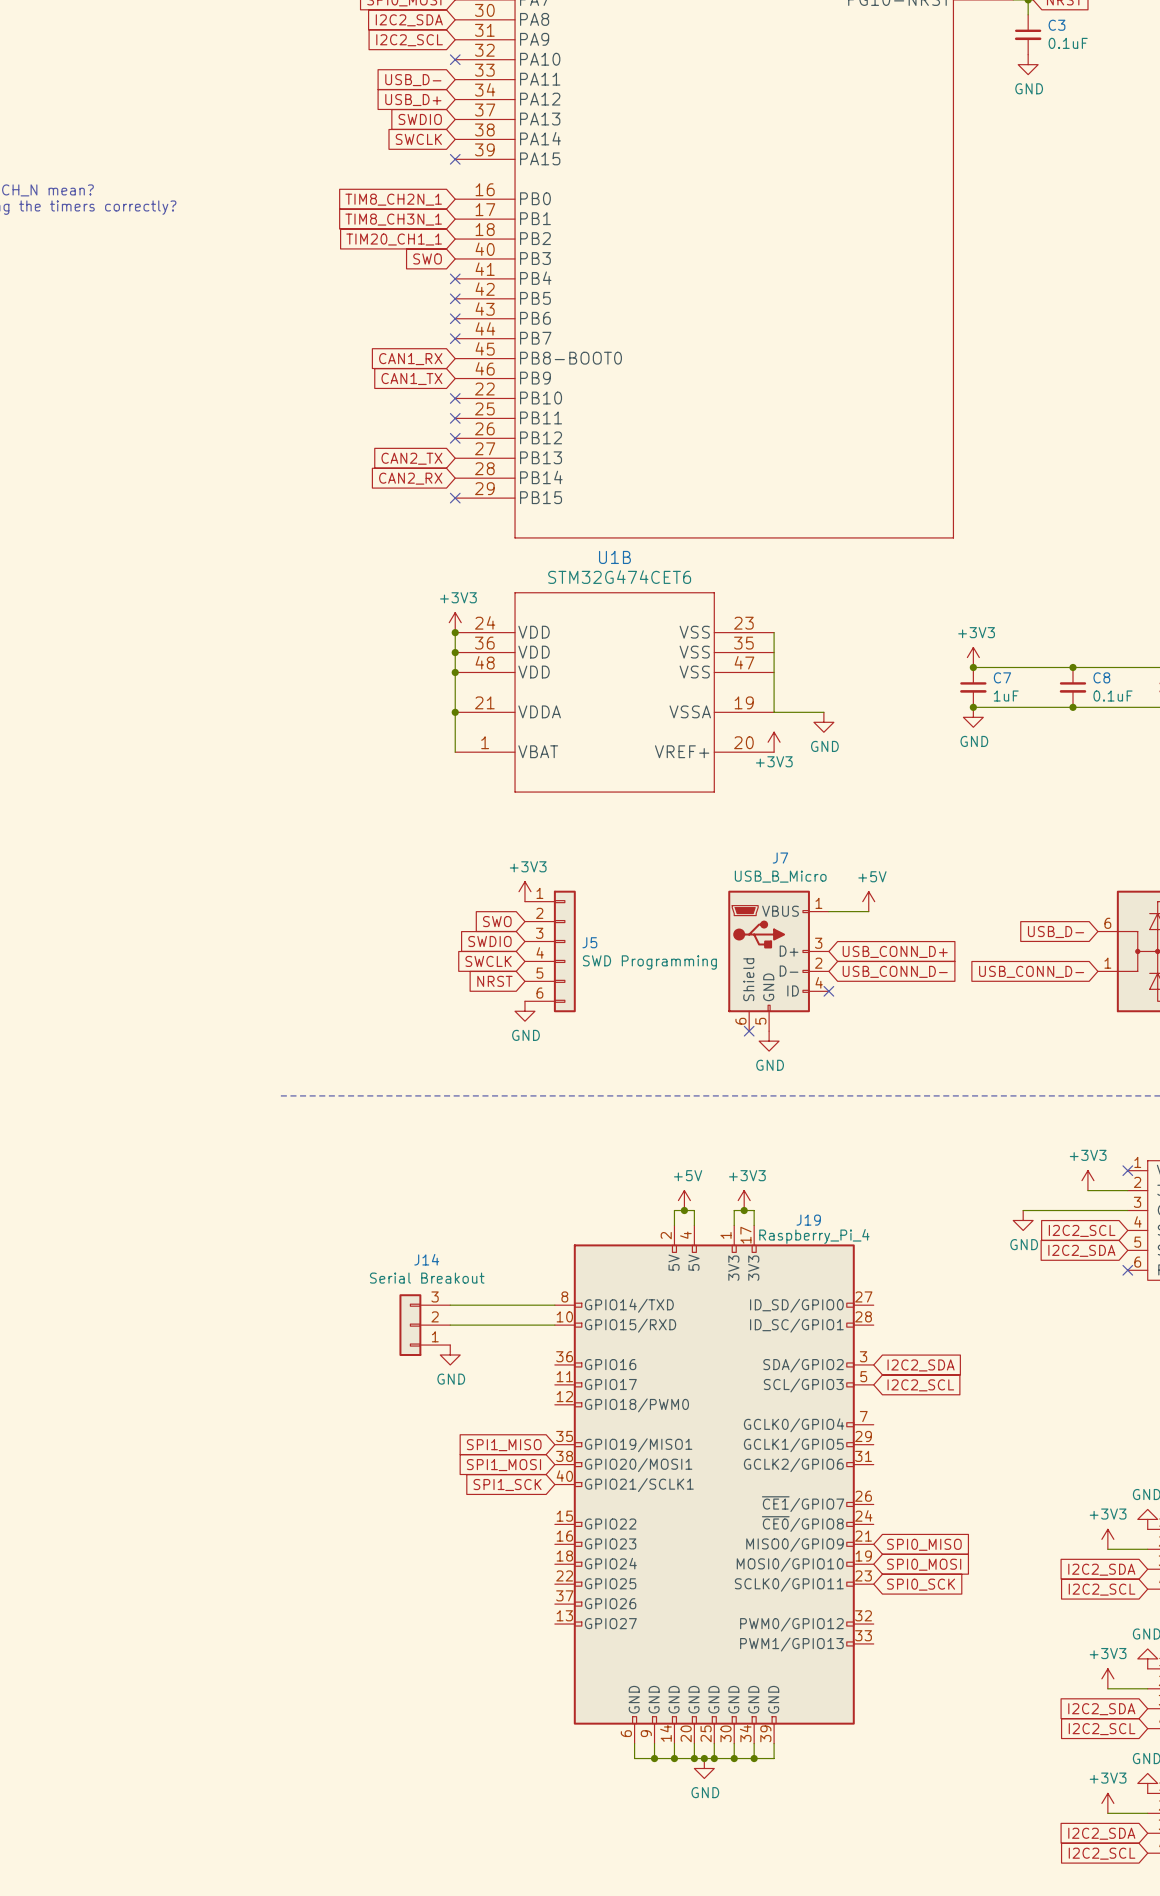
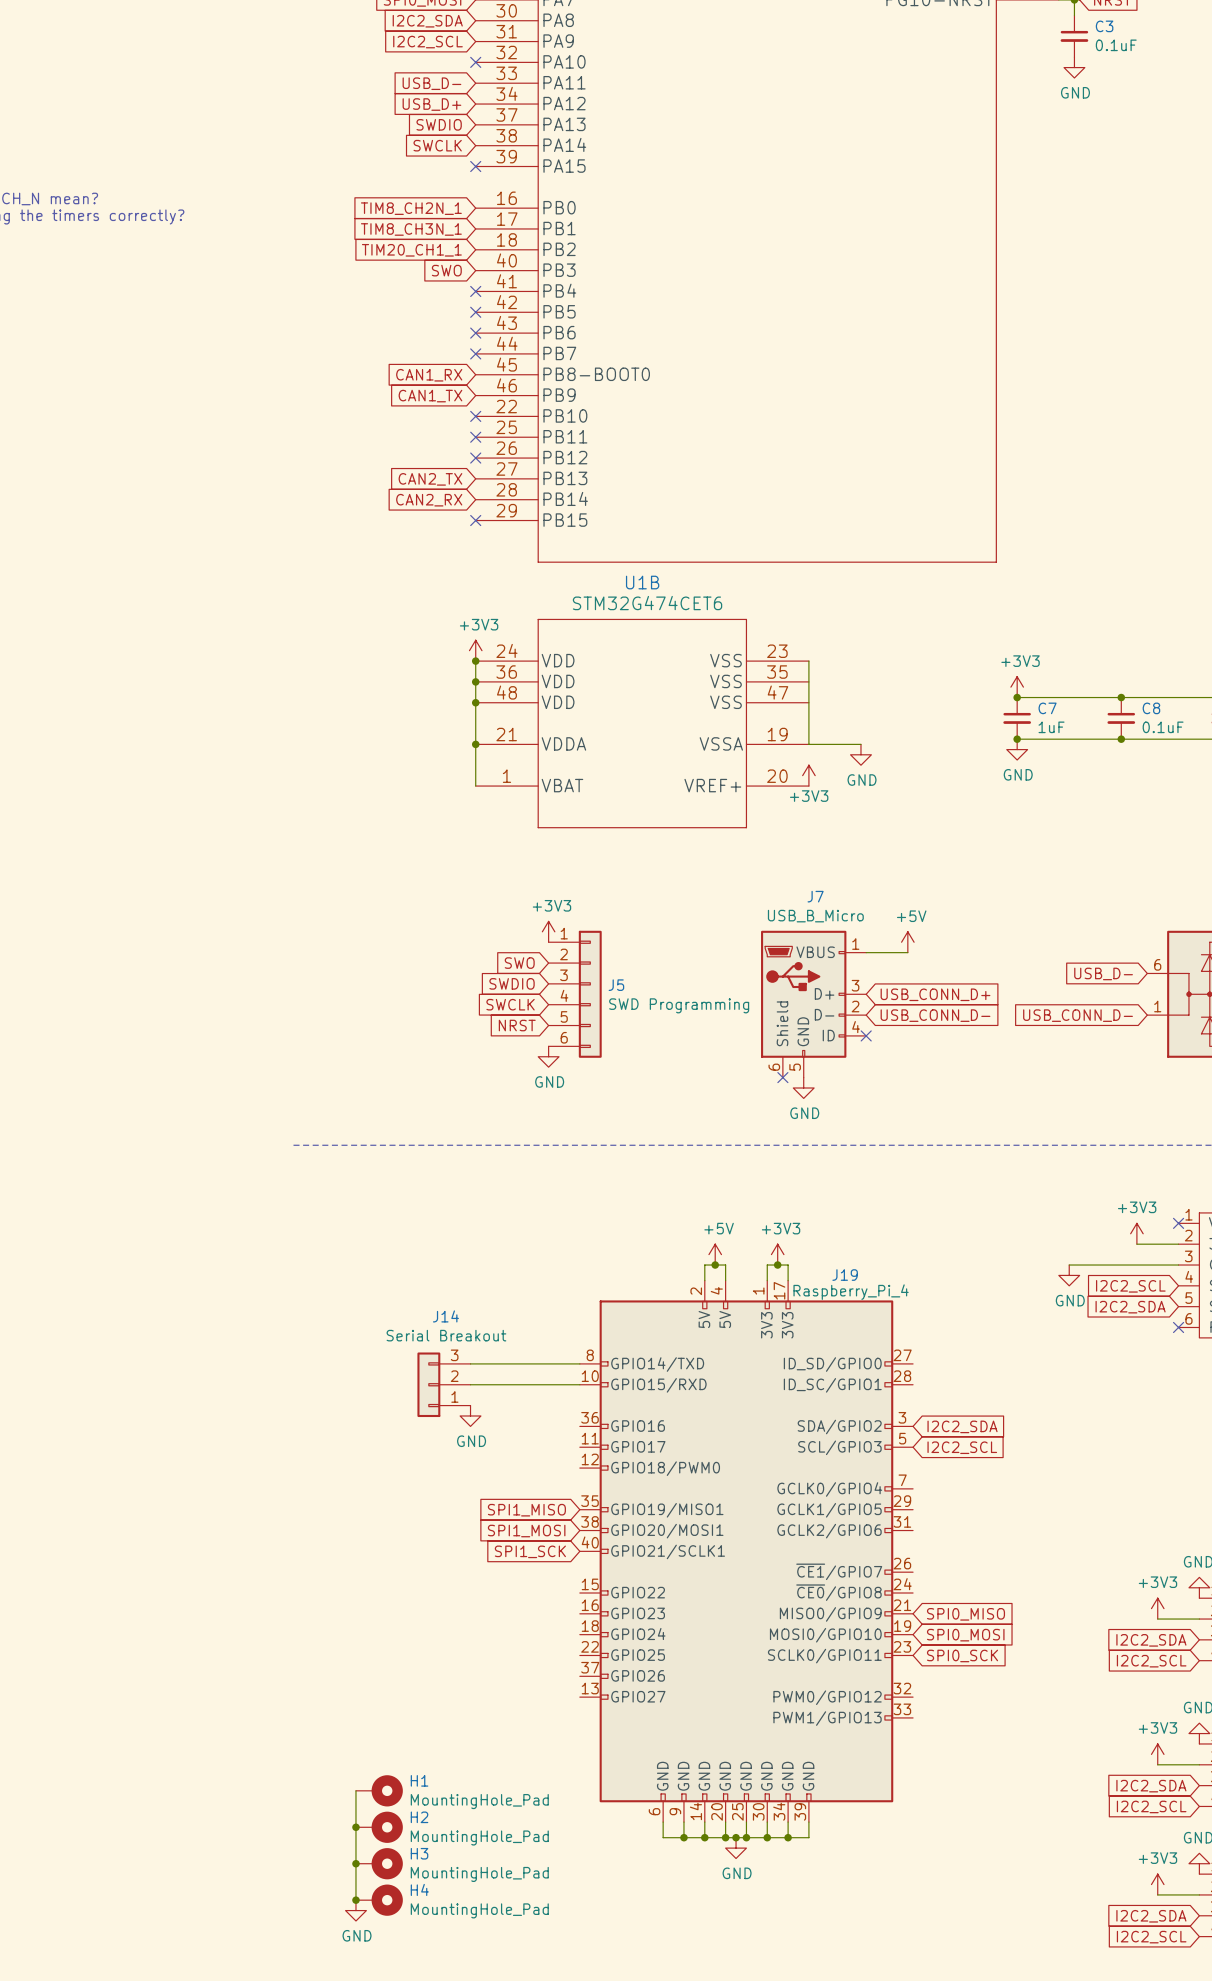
wire: none -> (355, 1790) (355, 1900)
H1: none -> MountingHole_Pad (379, 1790)
junction: none -> (355, 1827)
H2: none -> MountingHole_Pad (379, 1827)
junction: none -> (355, 1863)
H3: none -> MountingHole_Pad (379, 1863)
junction: none -> (355, 1900)
H4: none -> MountingHole_Pad (379, 1900)
power symbol: none -> GND (355, 1910)

